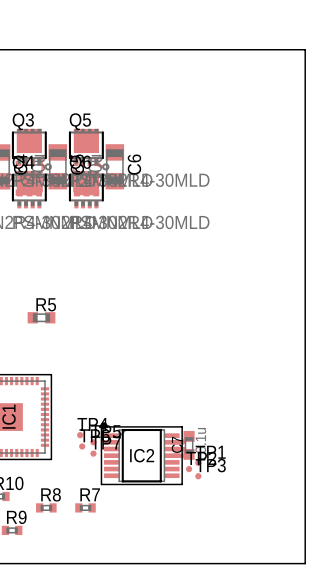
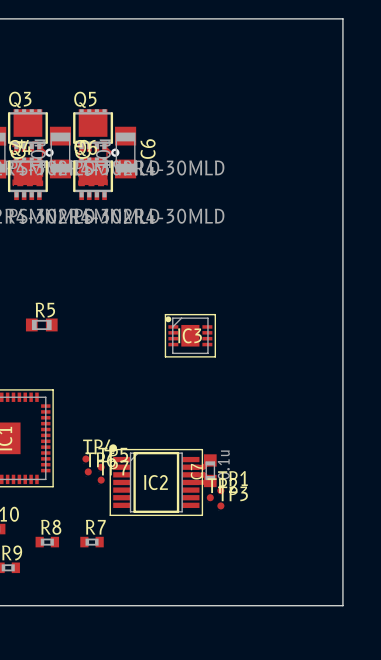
IC3: none -> (190, 335)

